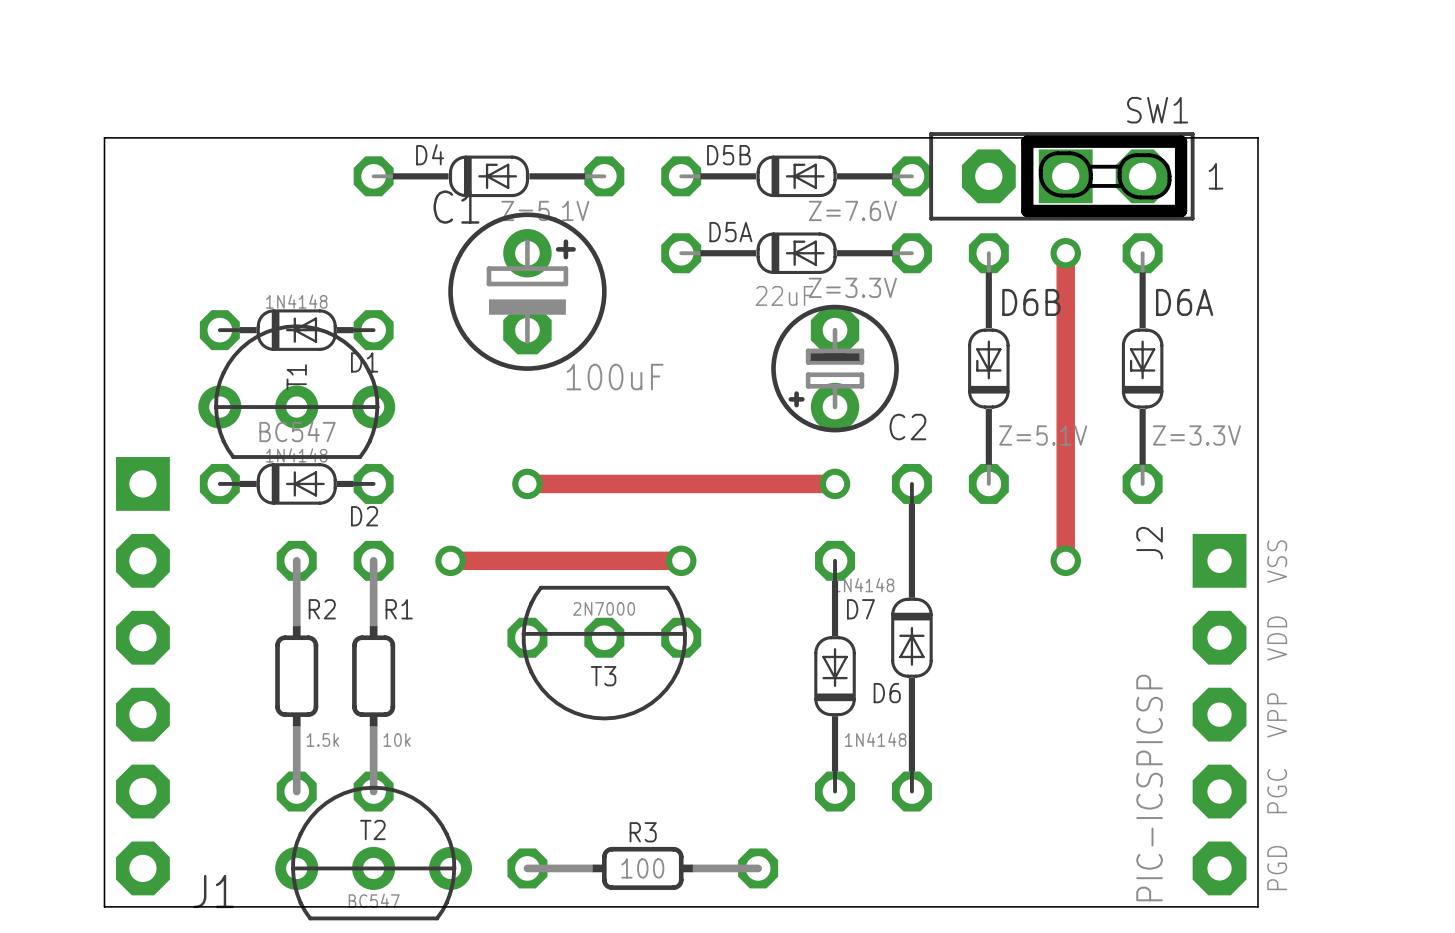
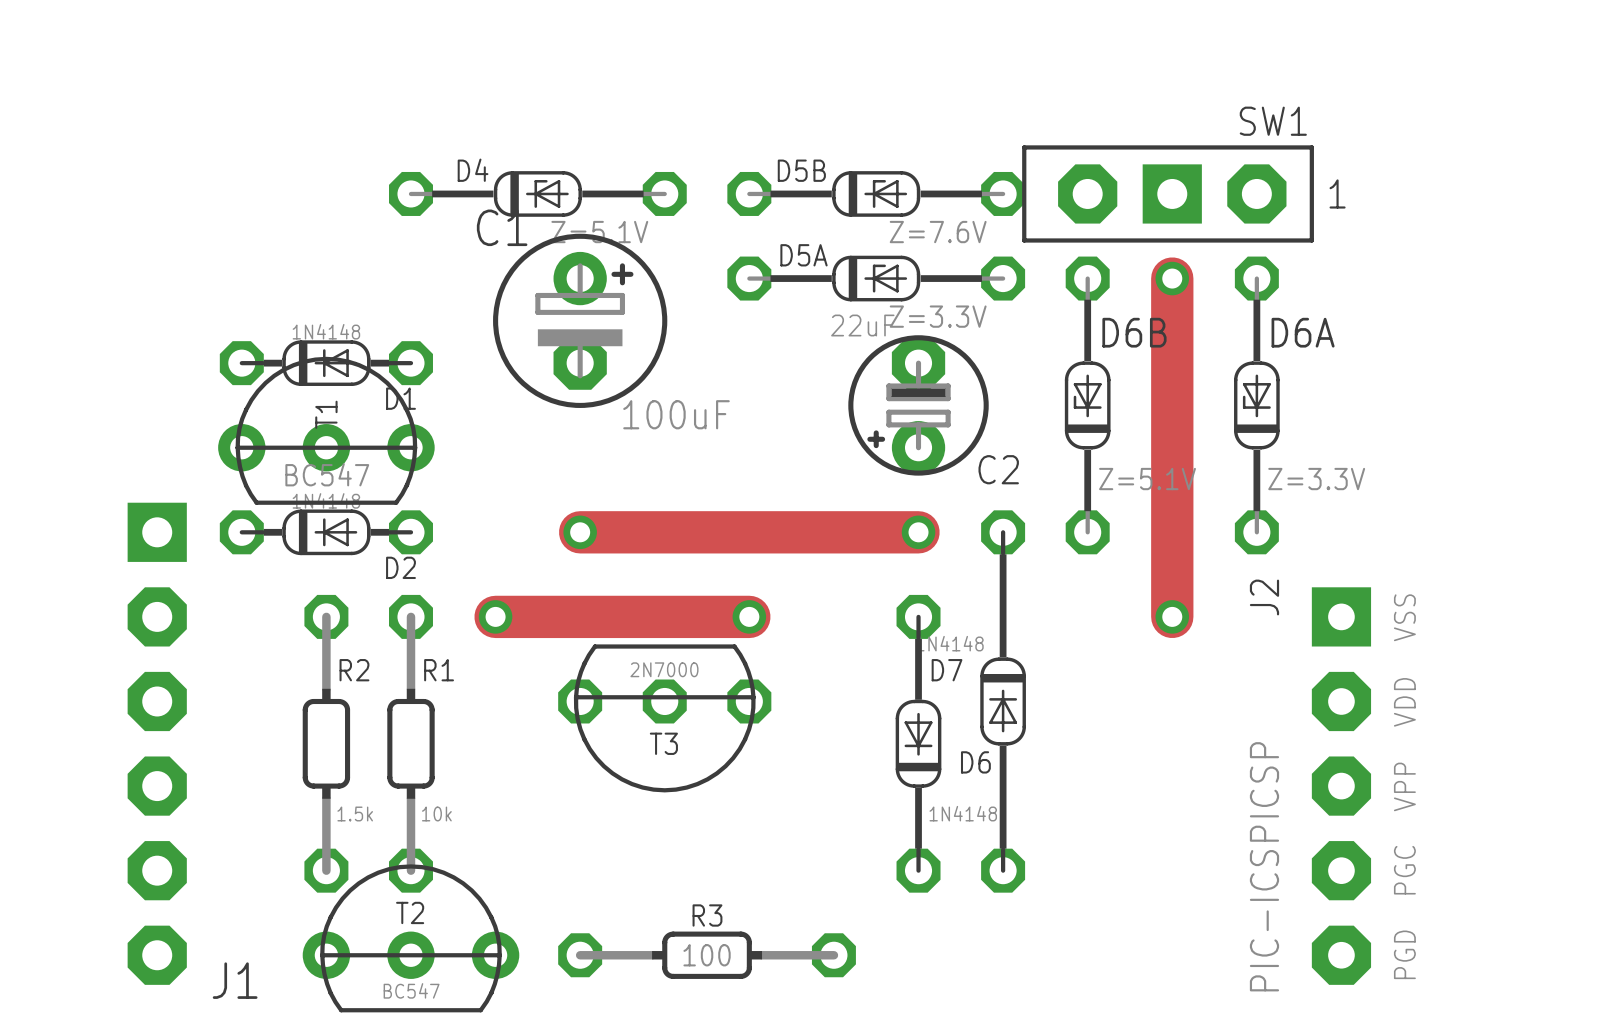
SW1 footprint: [929, 132, 1195, 221] -> [1022, 145, 1314, 243]
board edge: (104, 137) (1257, 137) (1257, 906) (104, 906) (104, 137) -> none
track width: thin (1065, 253) (1065, 560) -> thick (1172, 278) (1172, 616)
track width: thin (527, 483) (835, 483) -> thick (580, 532) (918, 532)
track width: thin (450, 560) (681, 560) -> thick (495, 616) (749, 616)

